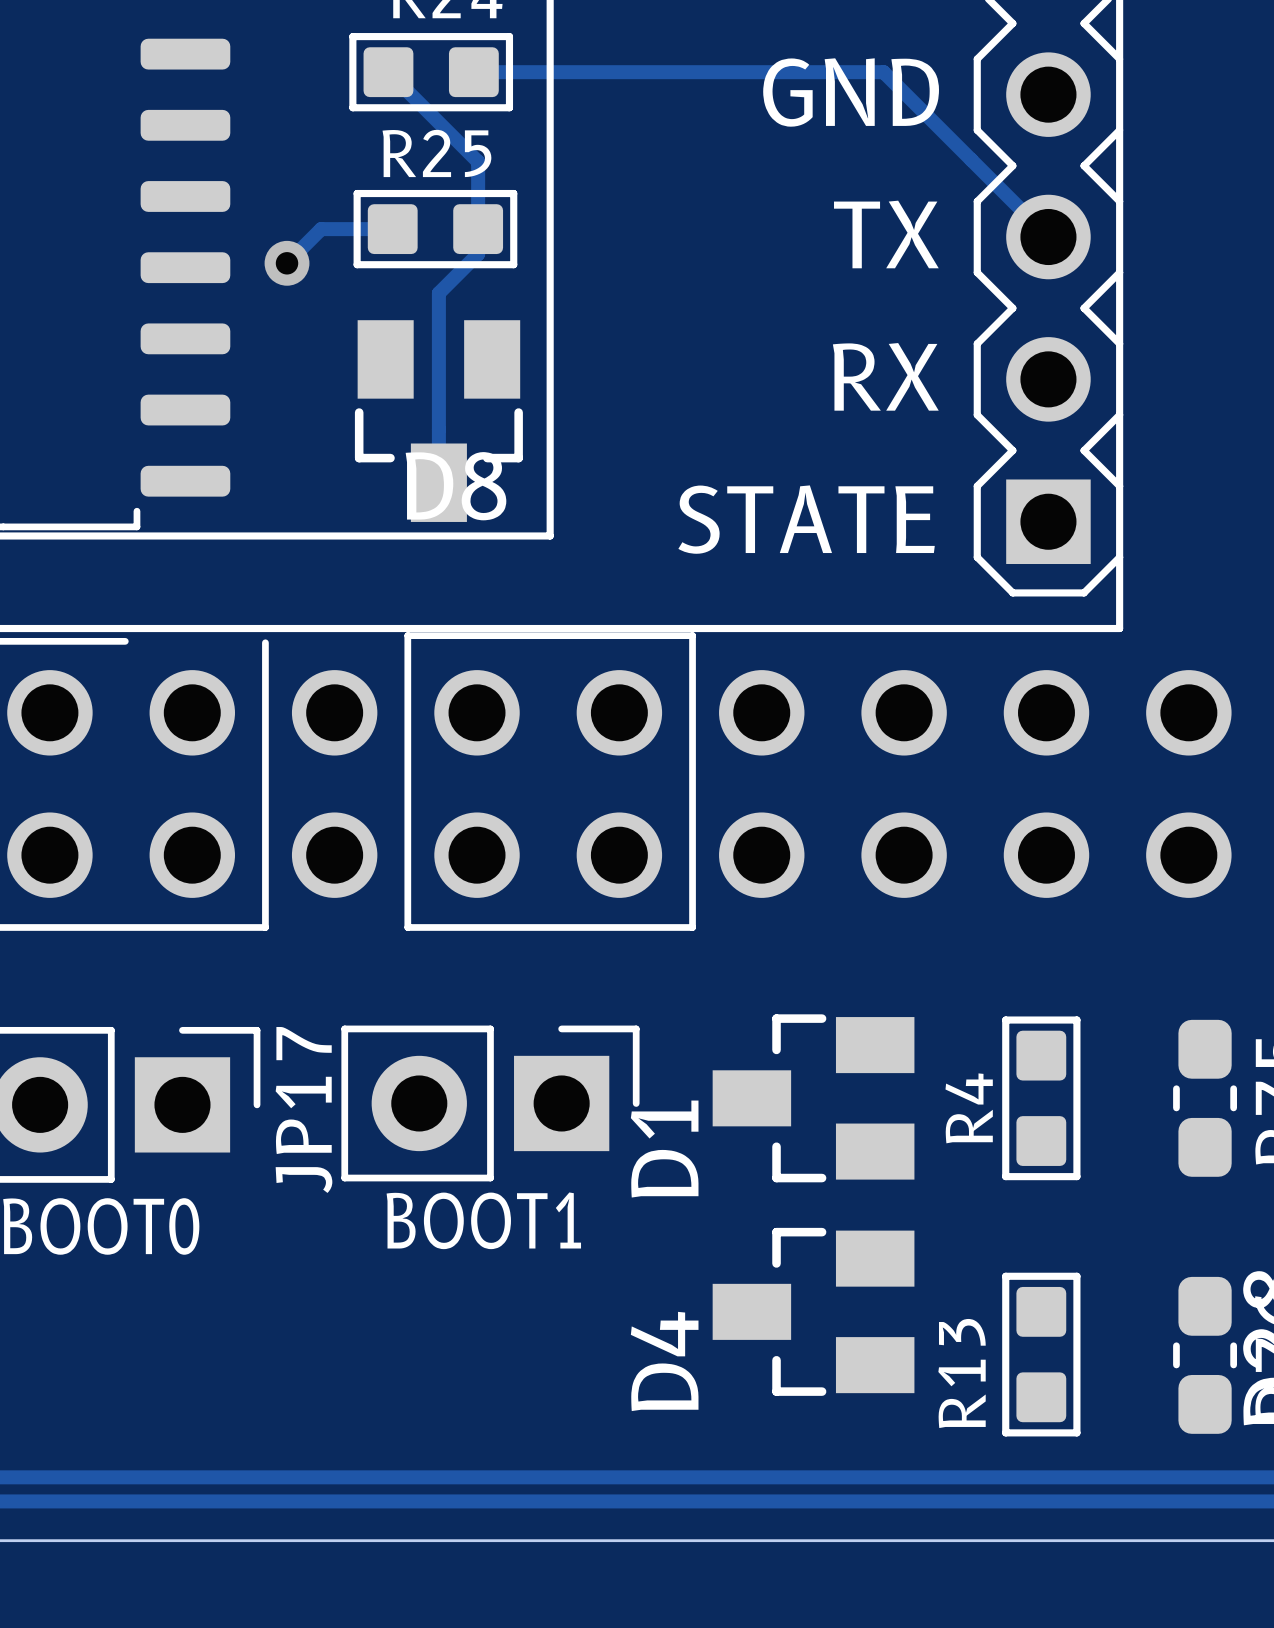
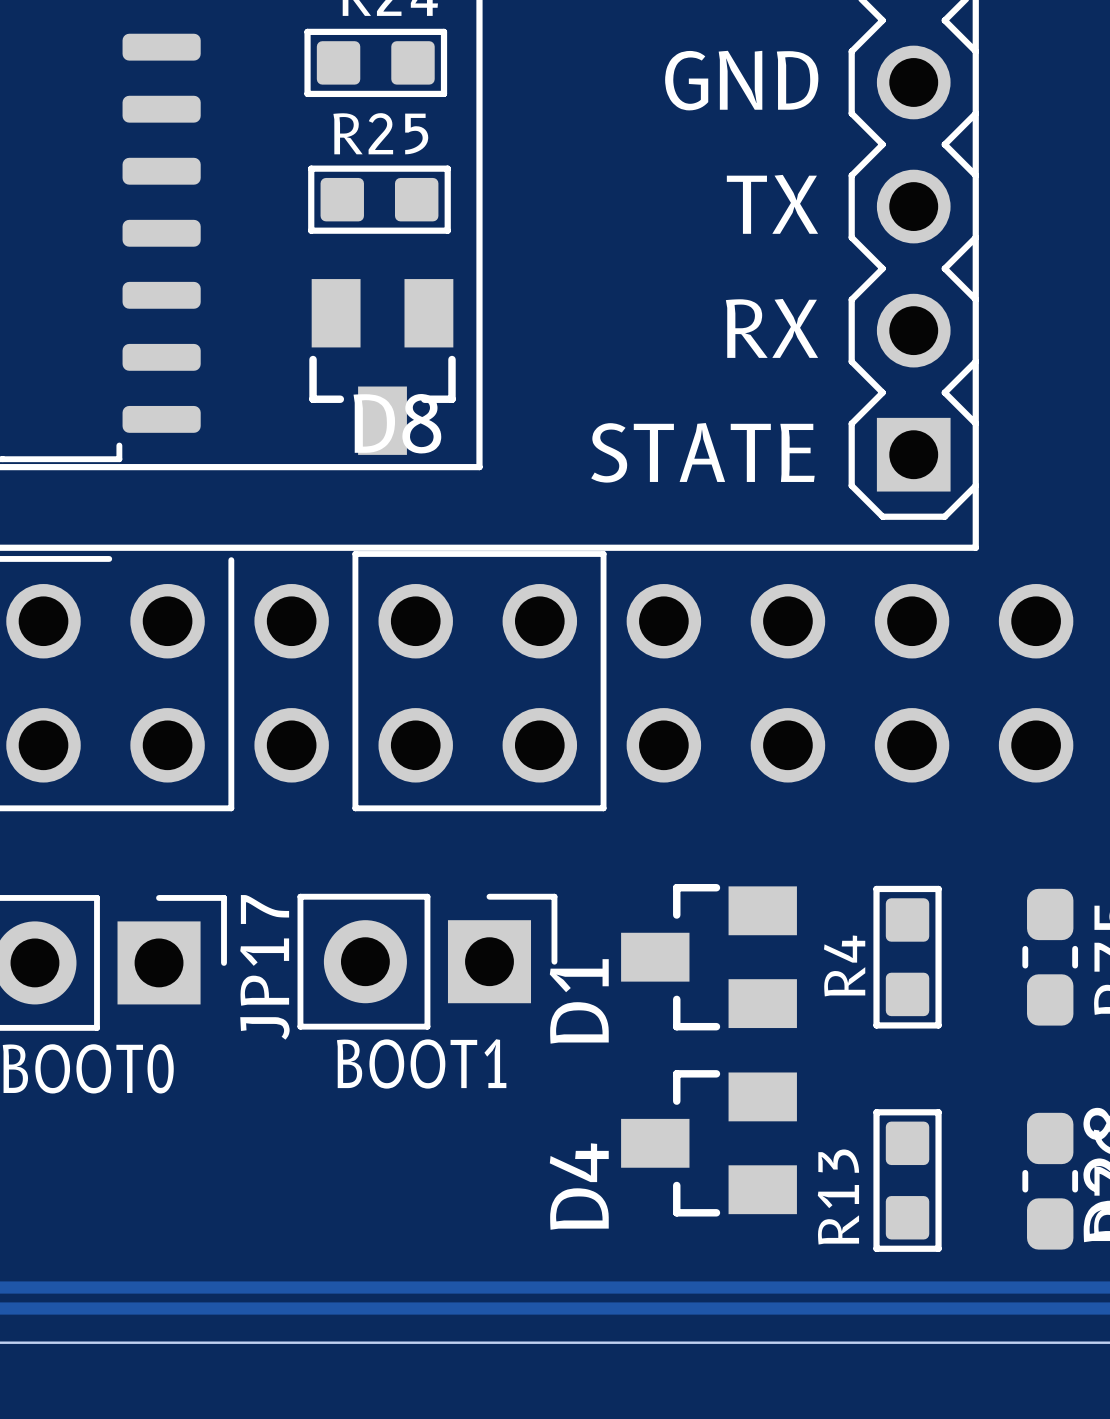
track: (388, 72) (478, 161) (478, 254) (438, 293) (438, 482) -> none
track: (473, 72) (883, 72) (1048, 237) -> none
track: (392, 229) (321, 229) (287, 263) -> none
via: (287, 263) -> none

